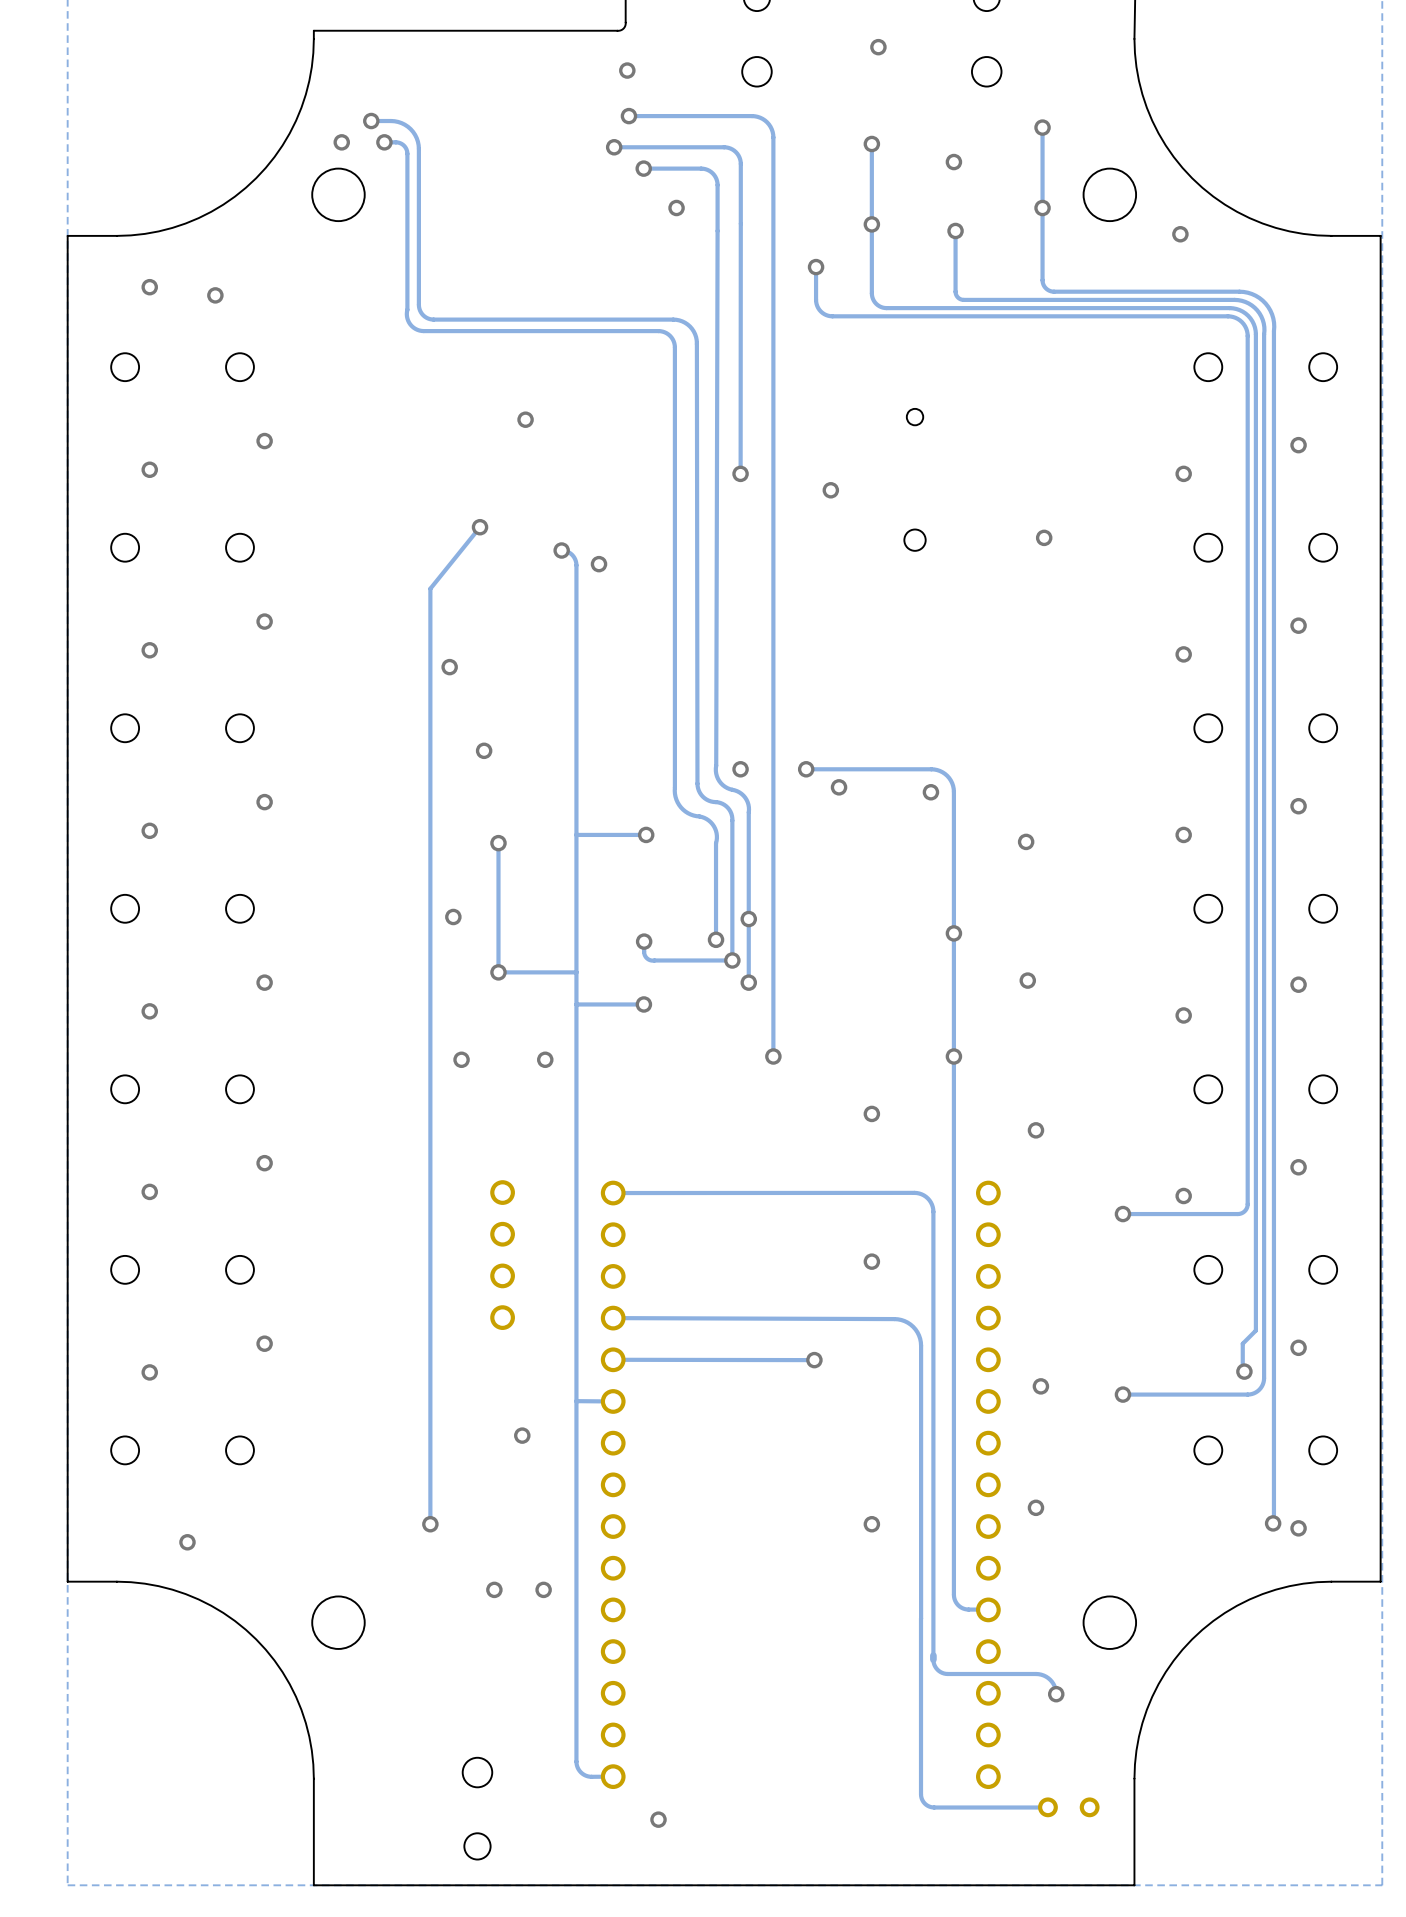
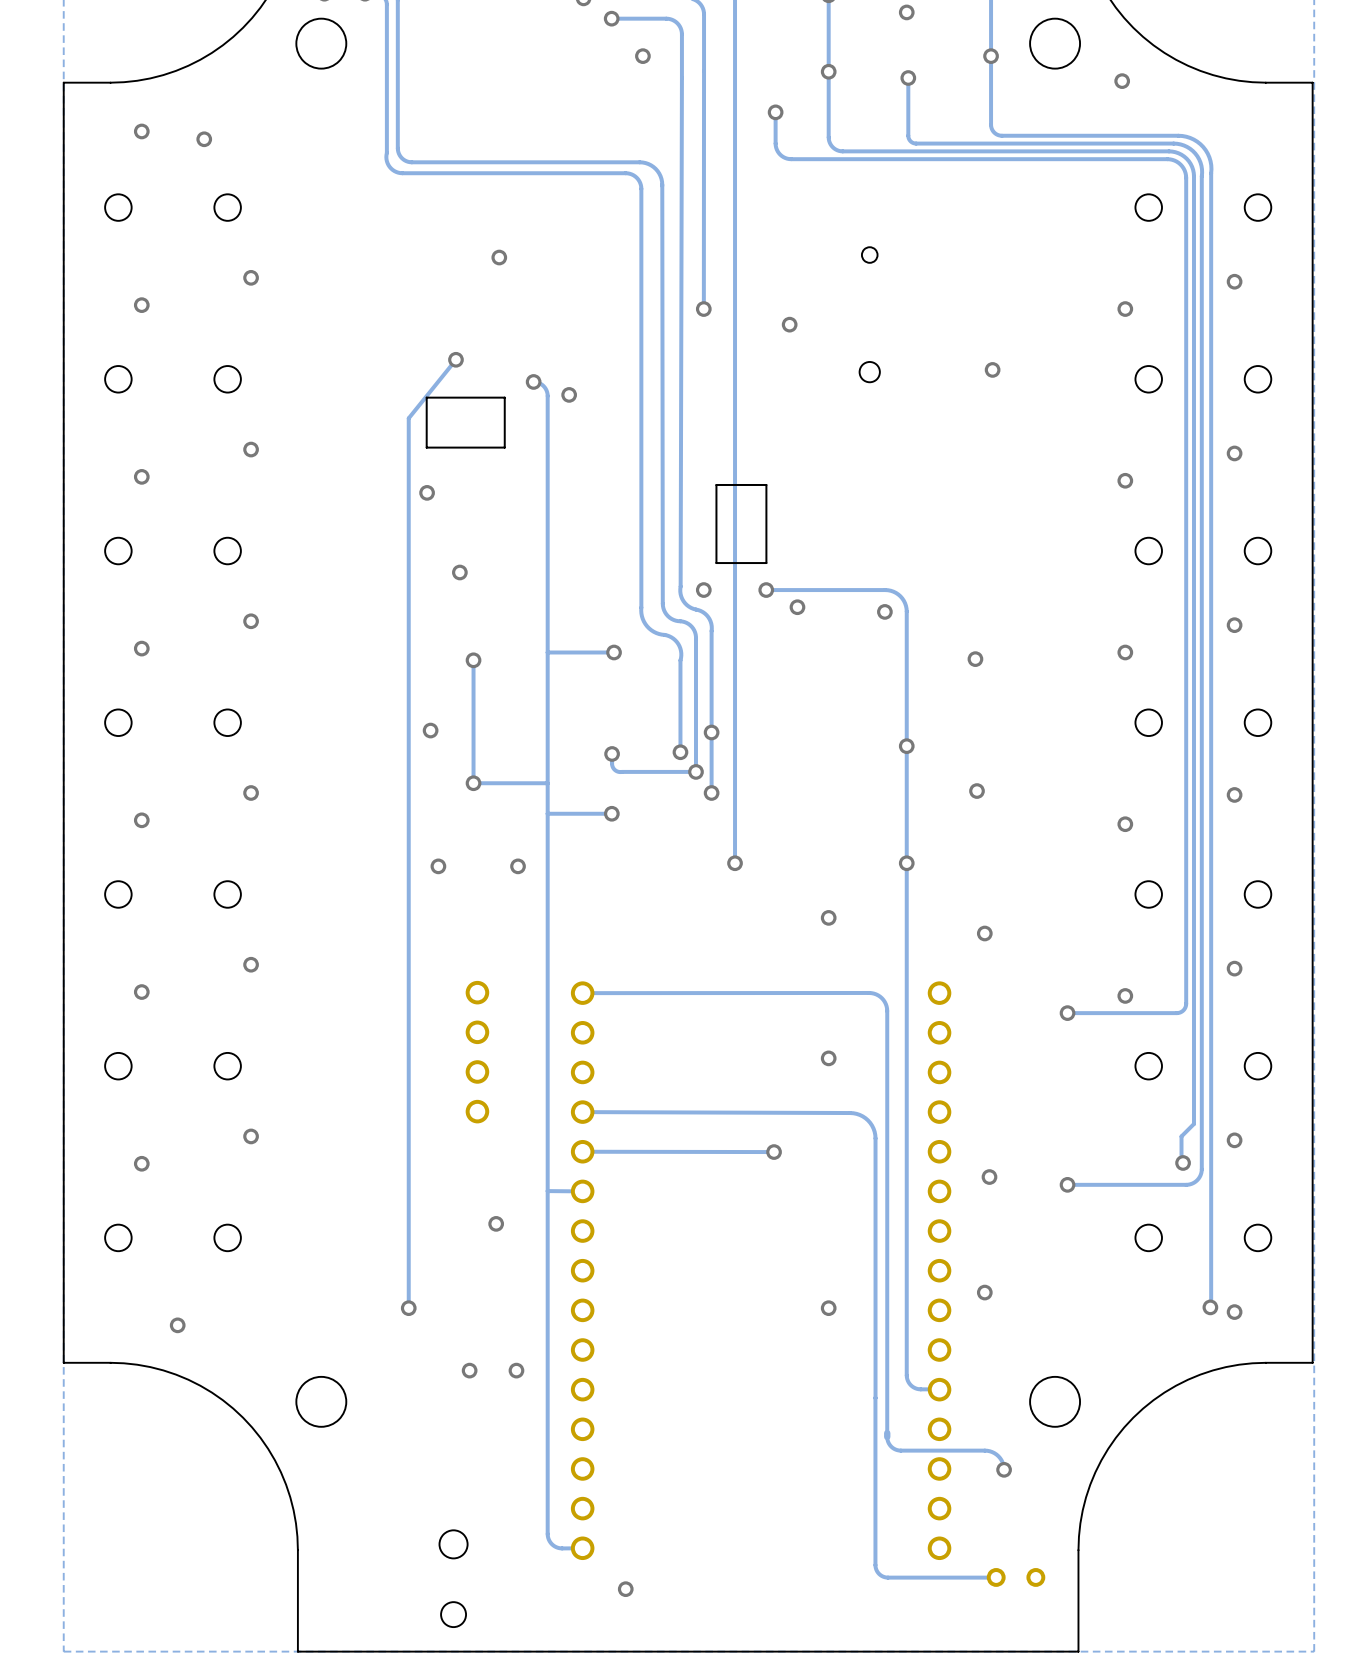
part: none -> (465, 422)
part: none -> (741, 524)

